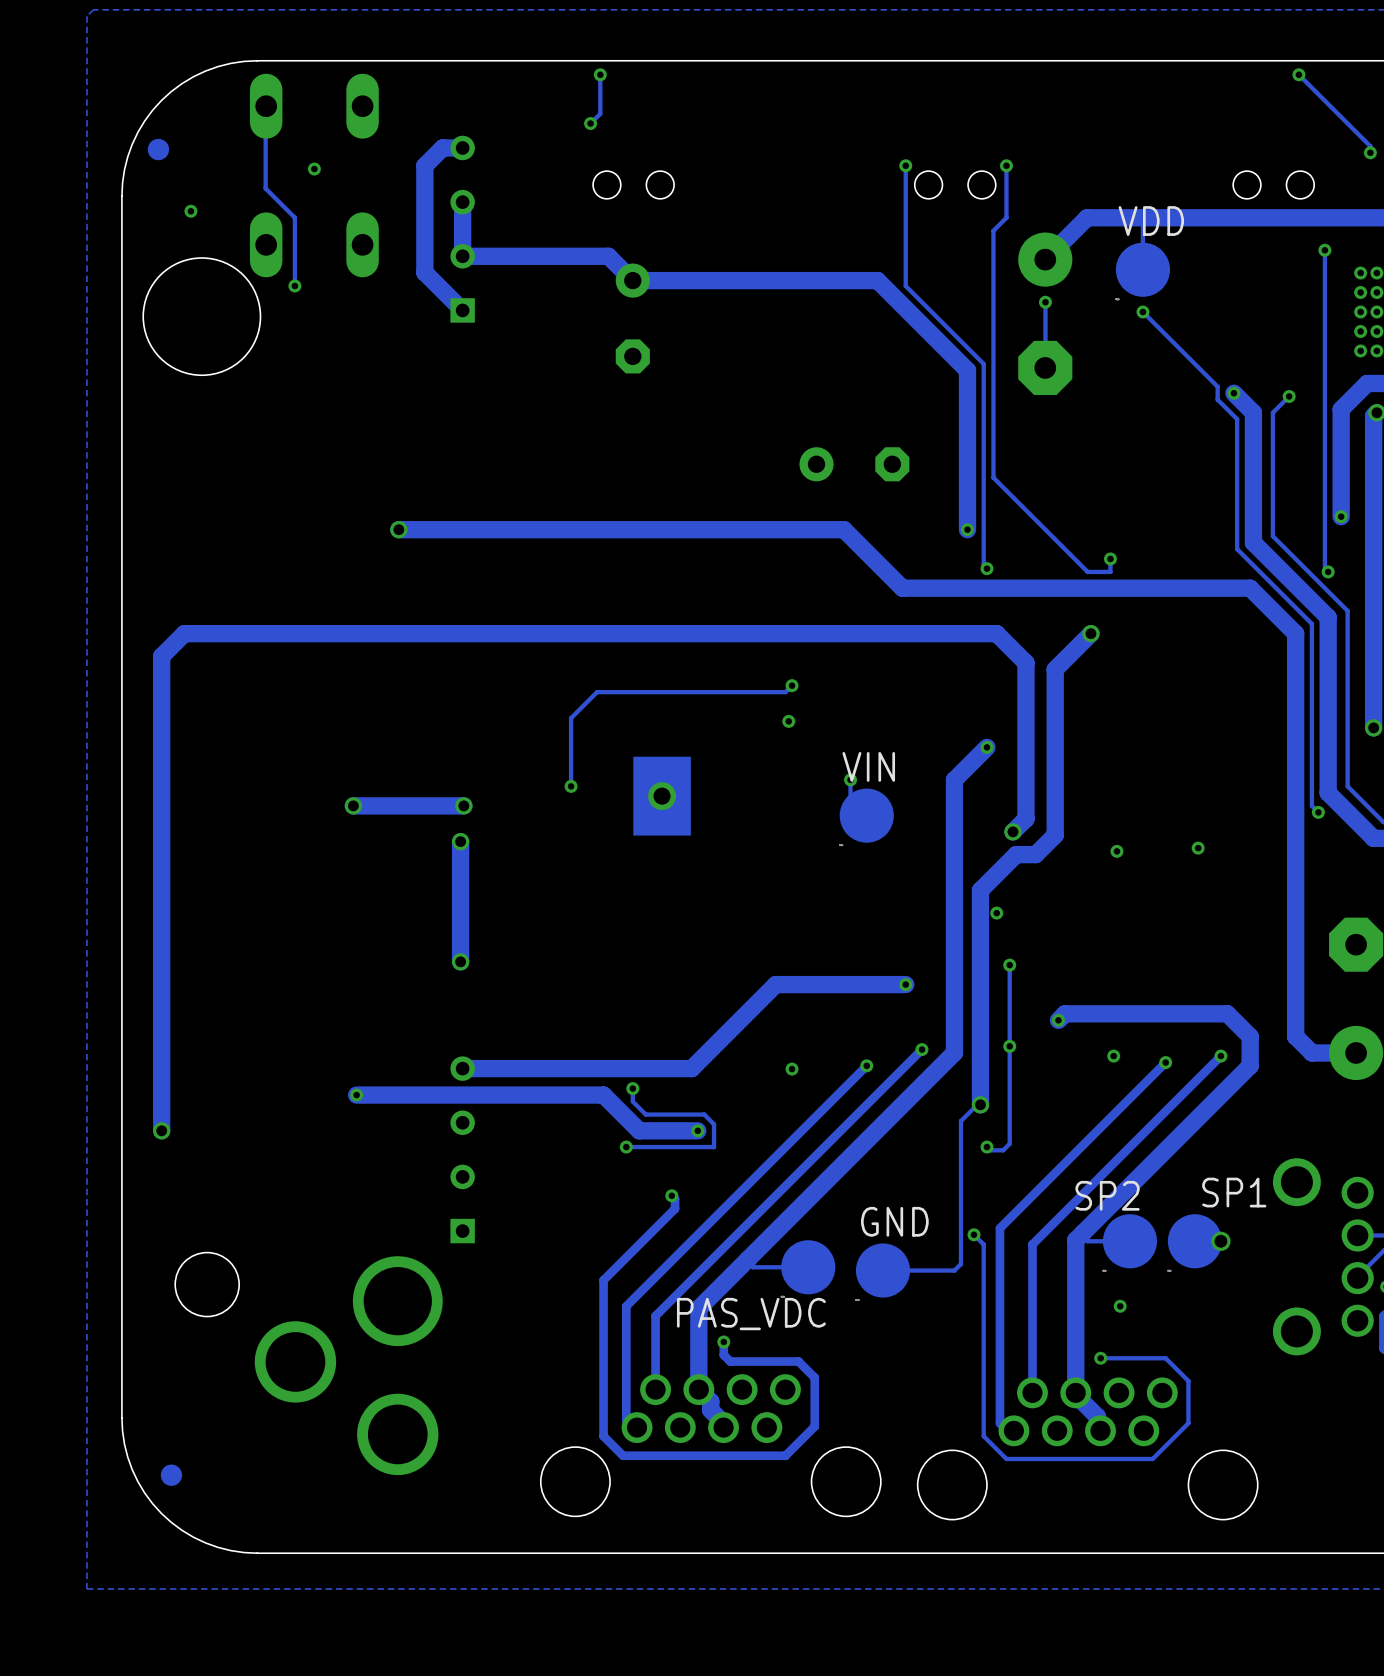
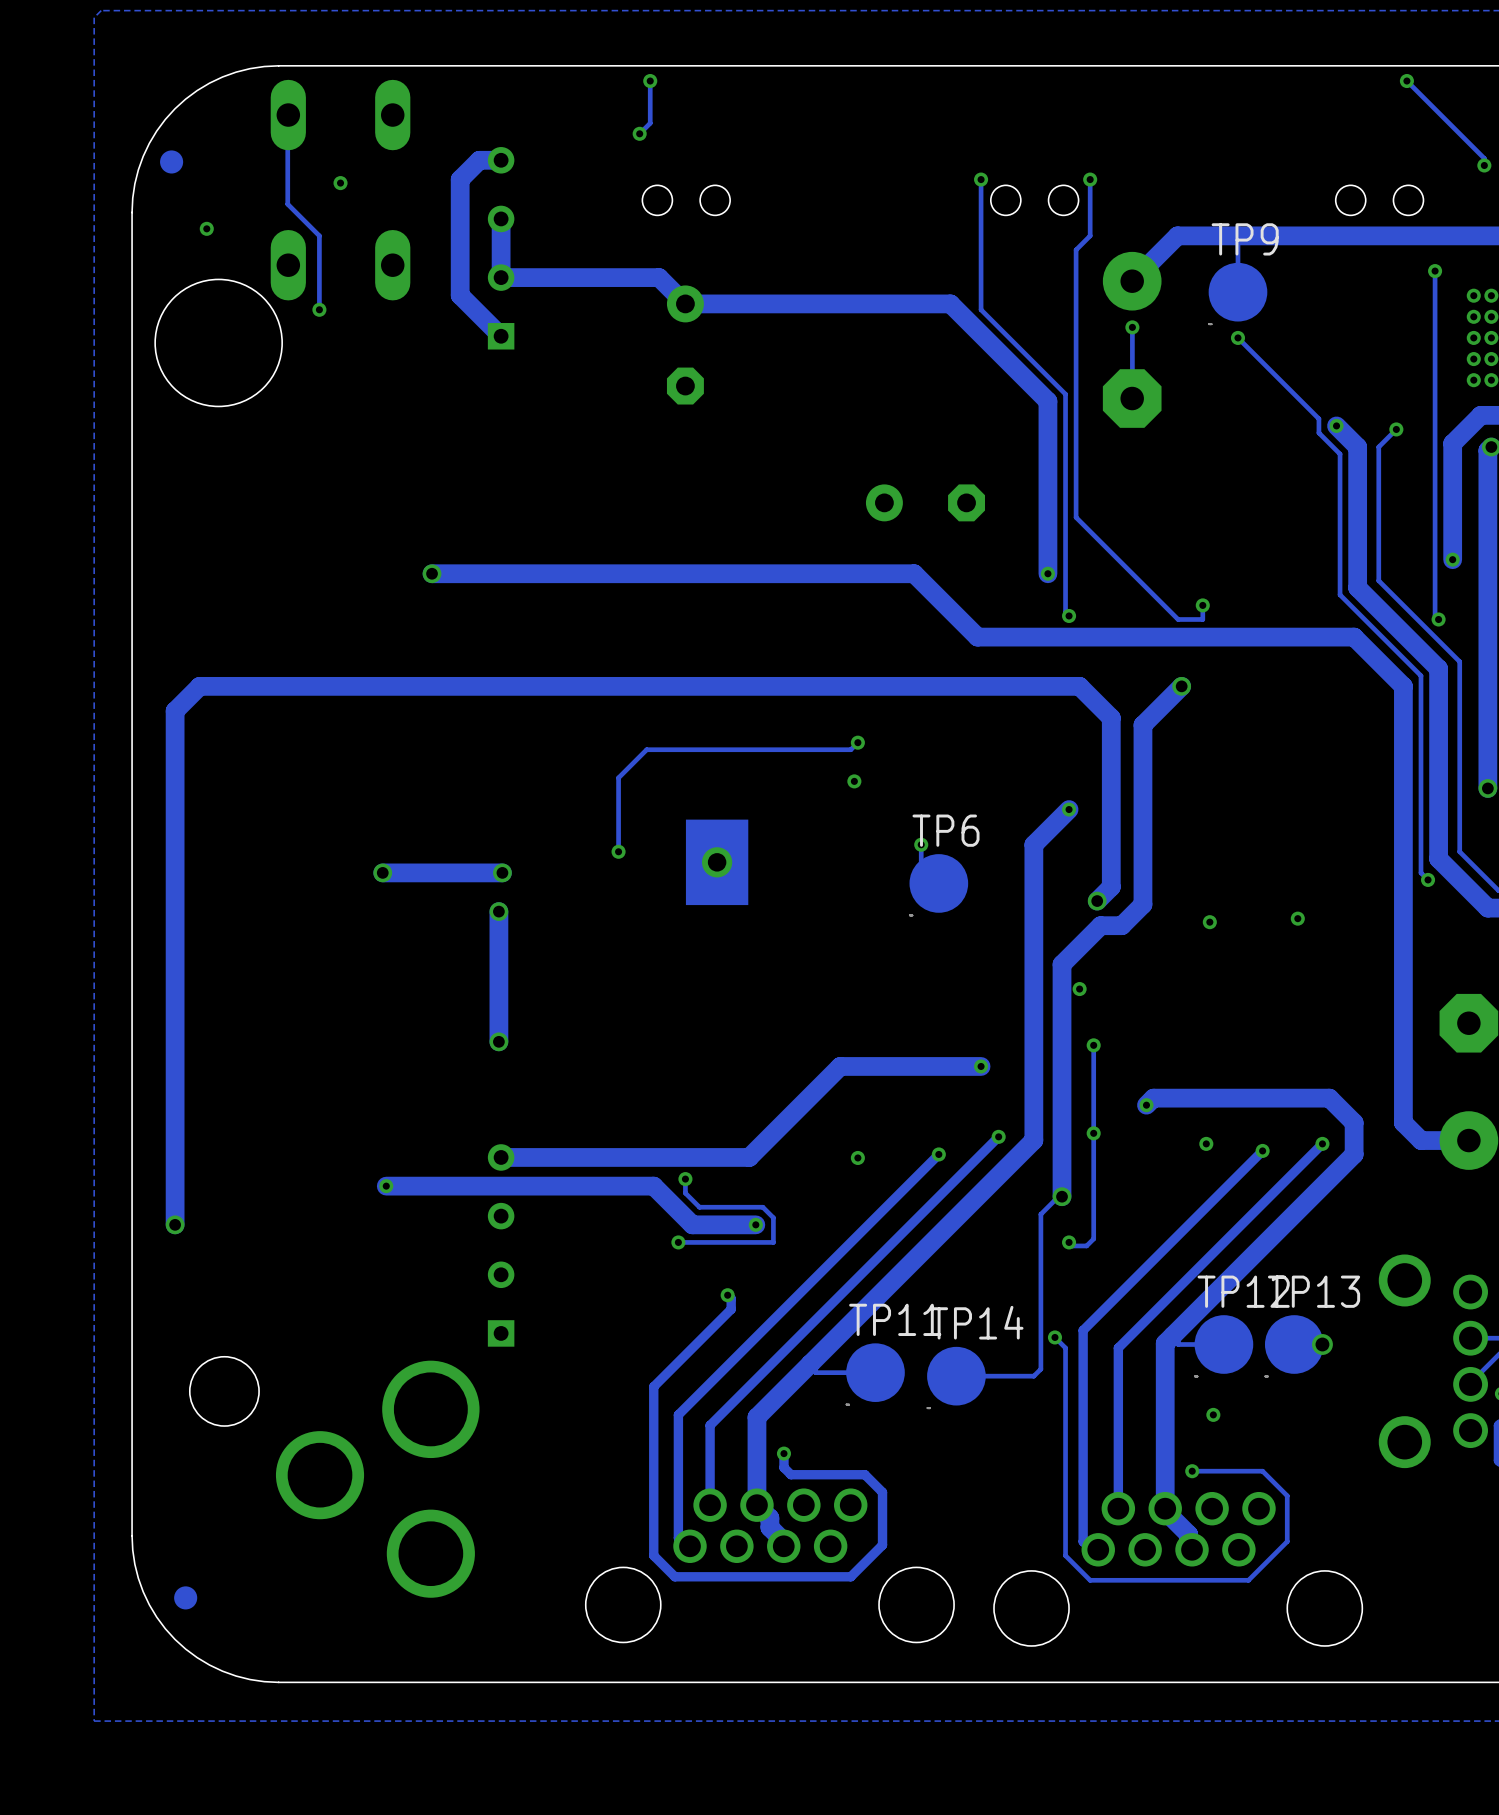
VDD name: VDD (1151, 221) -> TP9 (1245, 239)
VIN name: VIN (868, 766) -> TP6 (946, 830)
SP1 name: SP1 (1234, 1192) -> TP13 (1314, 1291)
SP2 name: SP2 (1107, 1195) -> TP12 (1243, 1291)
GND name: GND (894, 1221) -> TP14 (976, 1322)
PAS_VDC name: PAS_VDC (751, 1314) -> TP11 (895, 1319)

